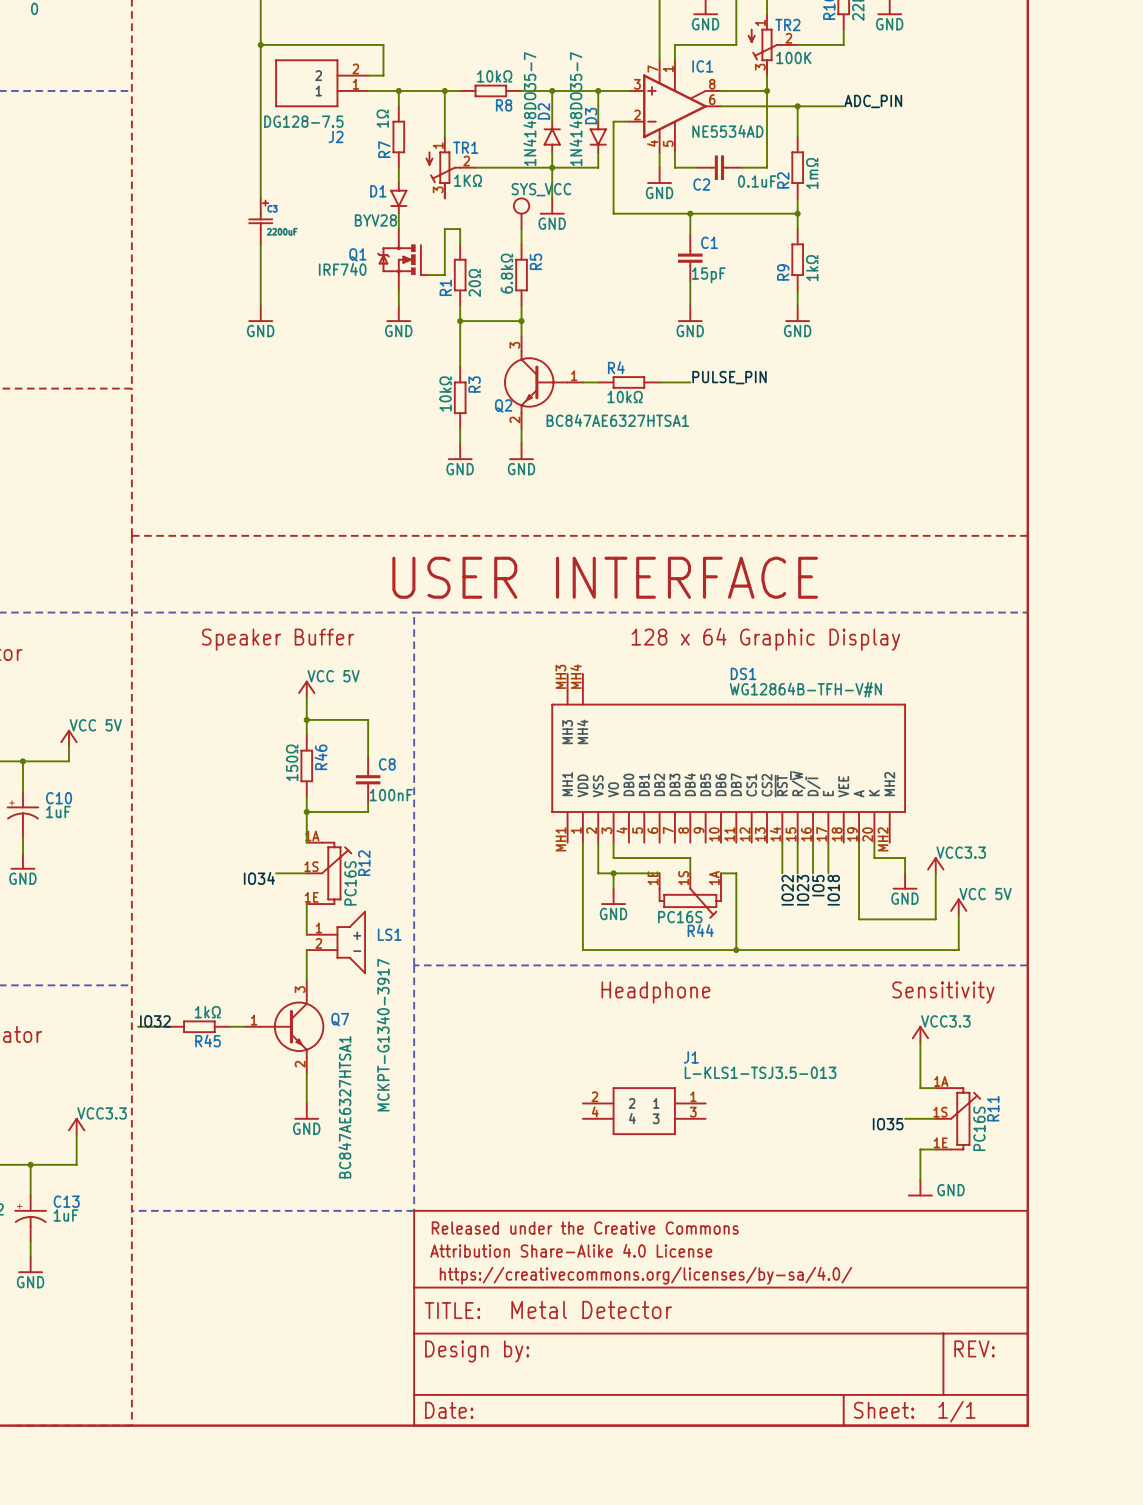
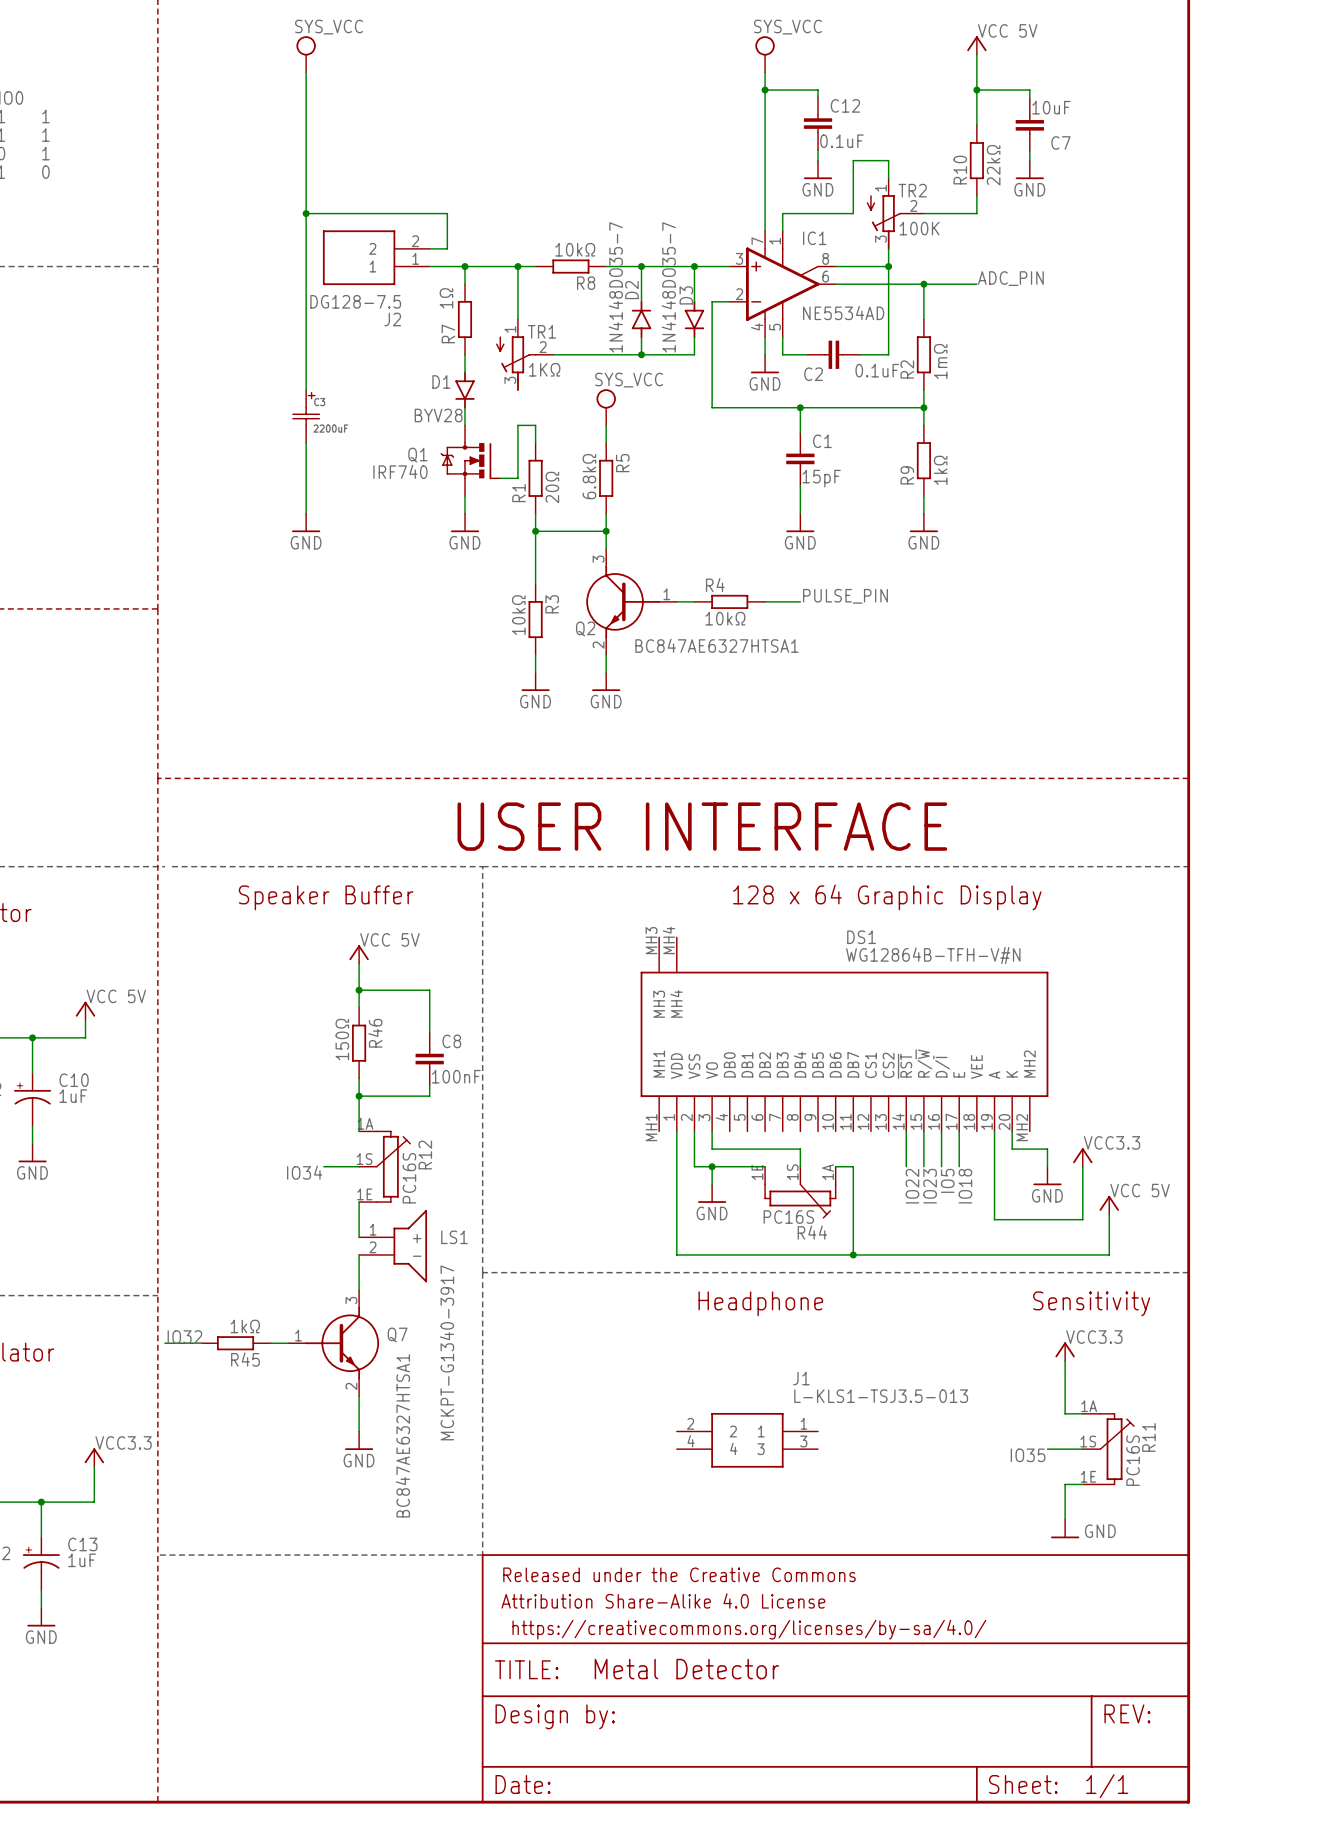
wire: (552, 167) (552, 198) -> none
power symbol: GND (552, 206) -> none

